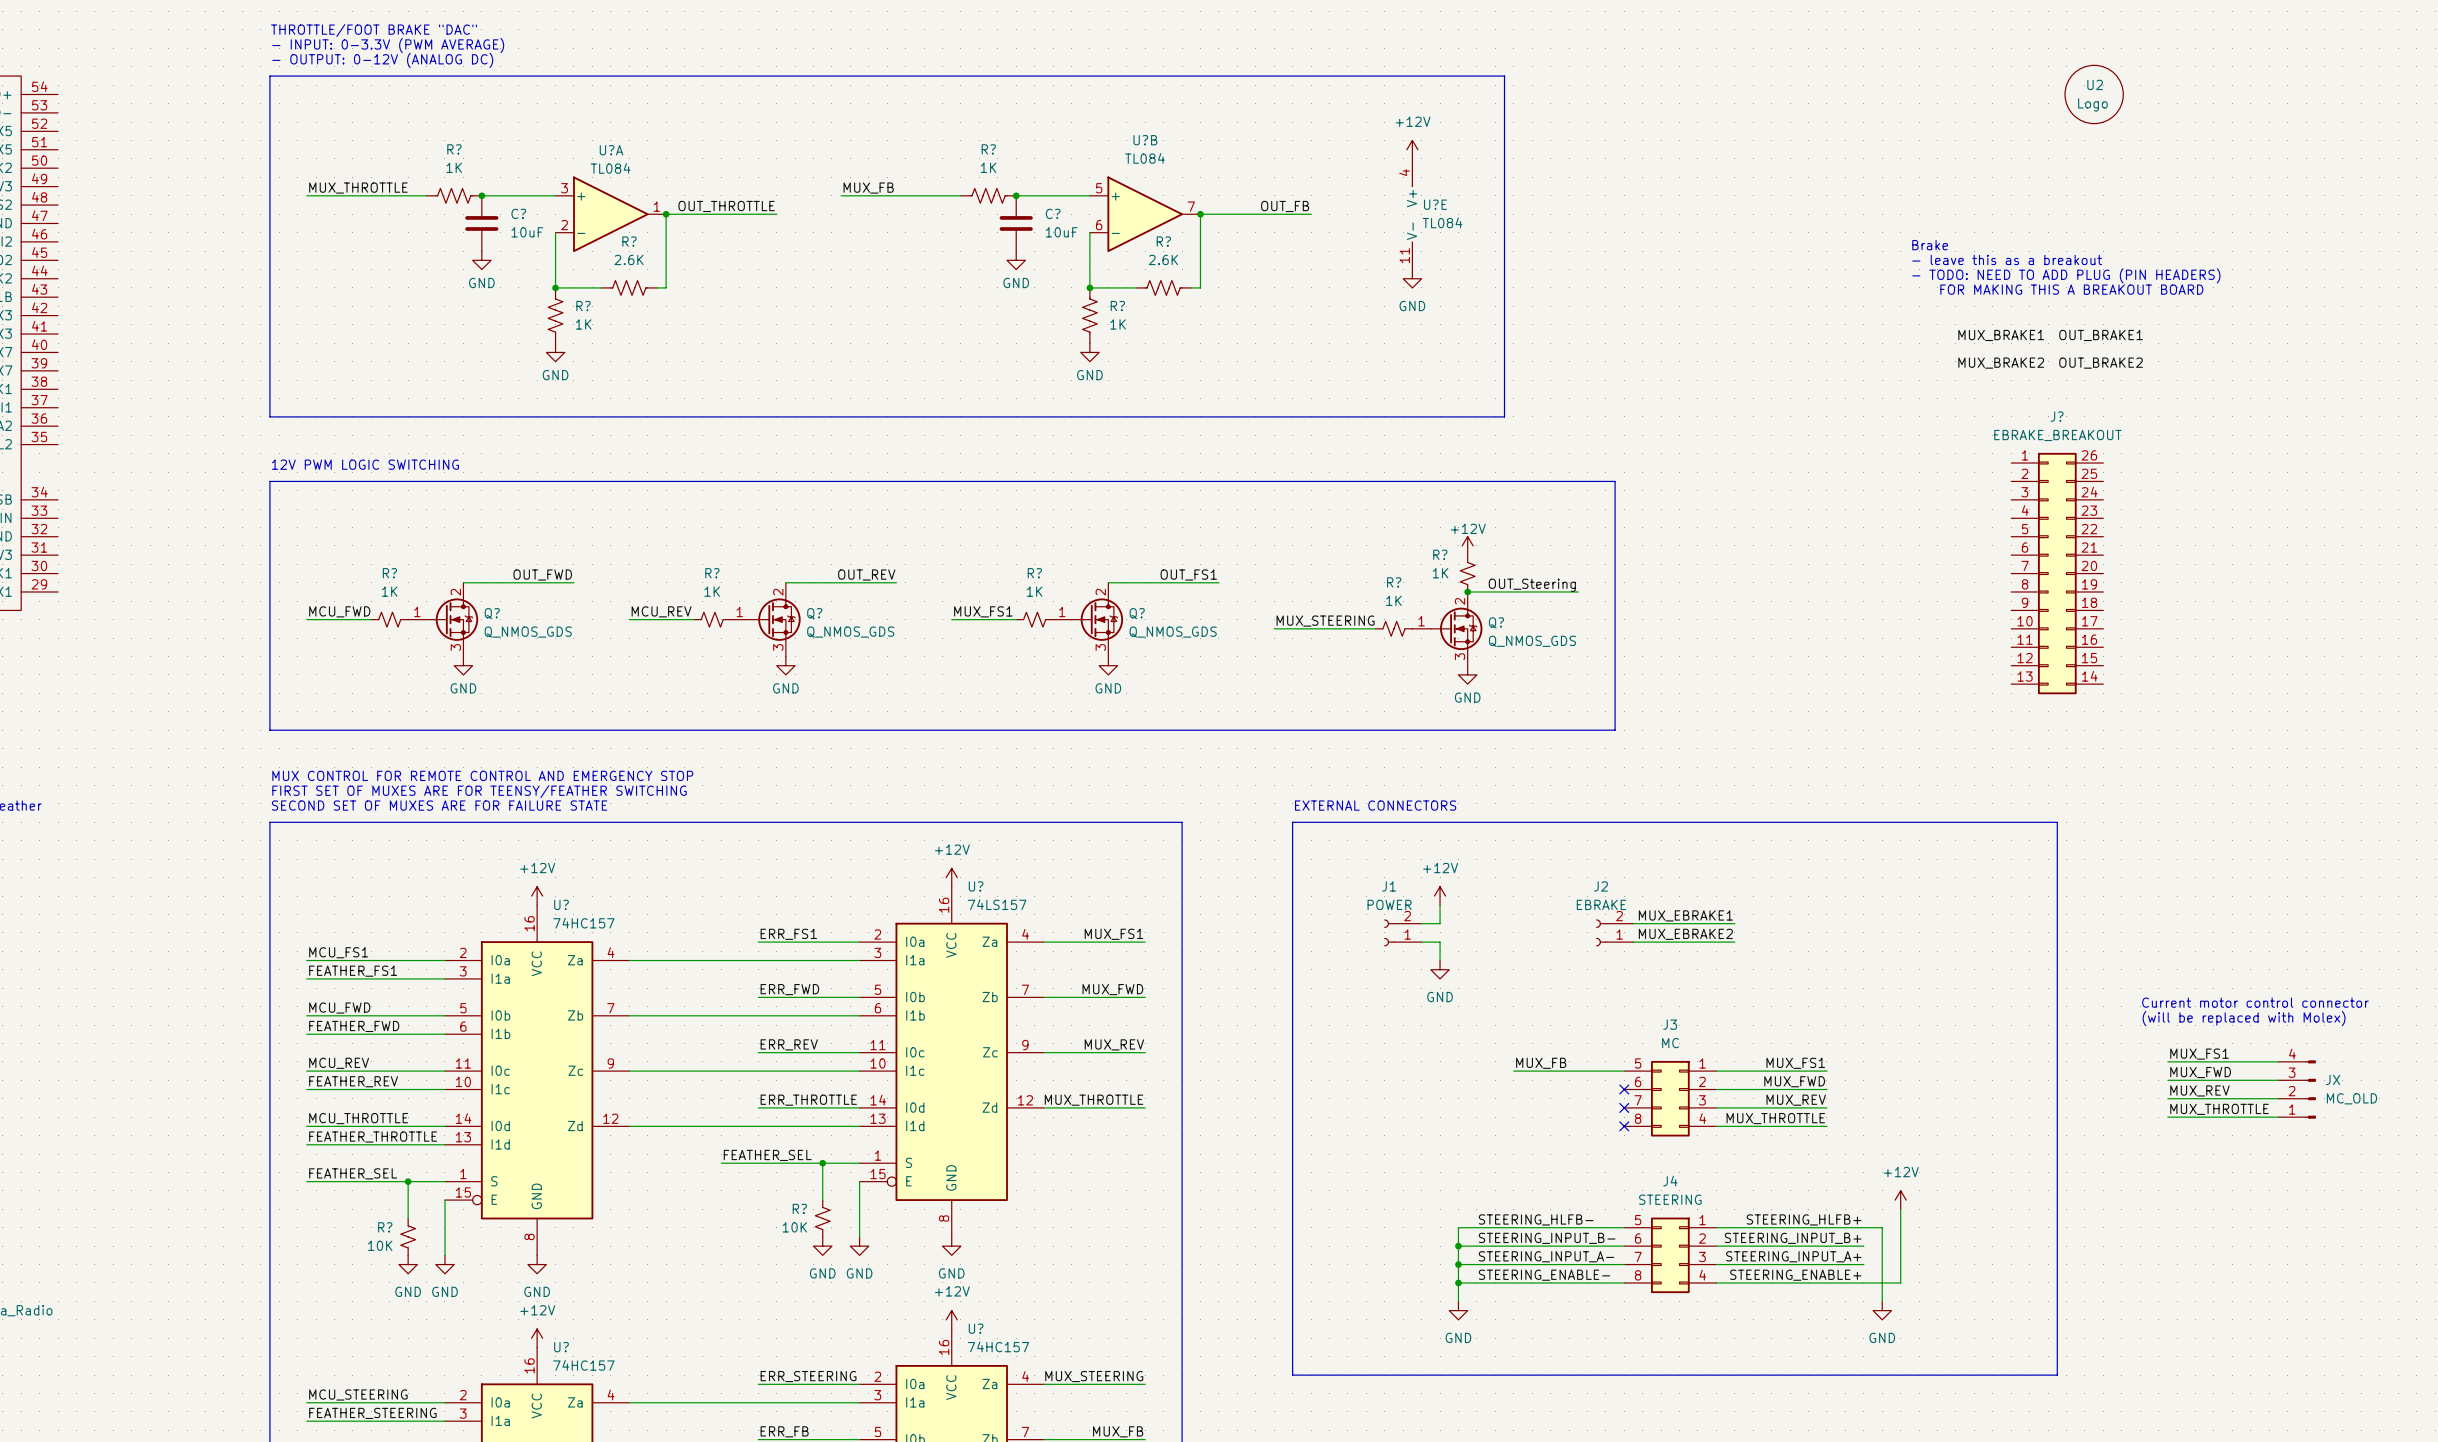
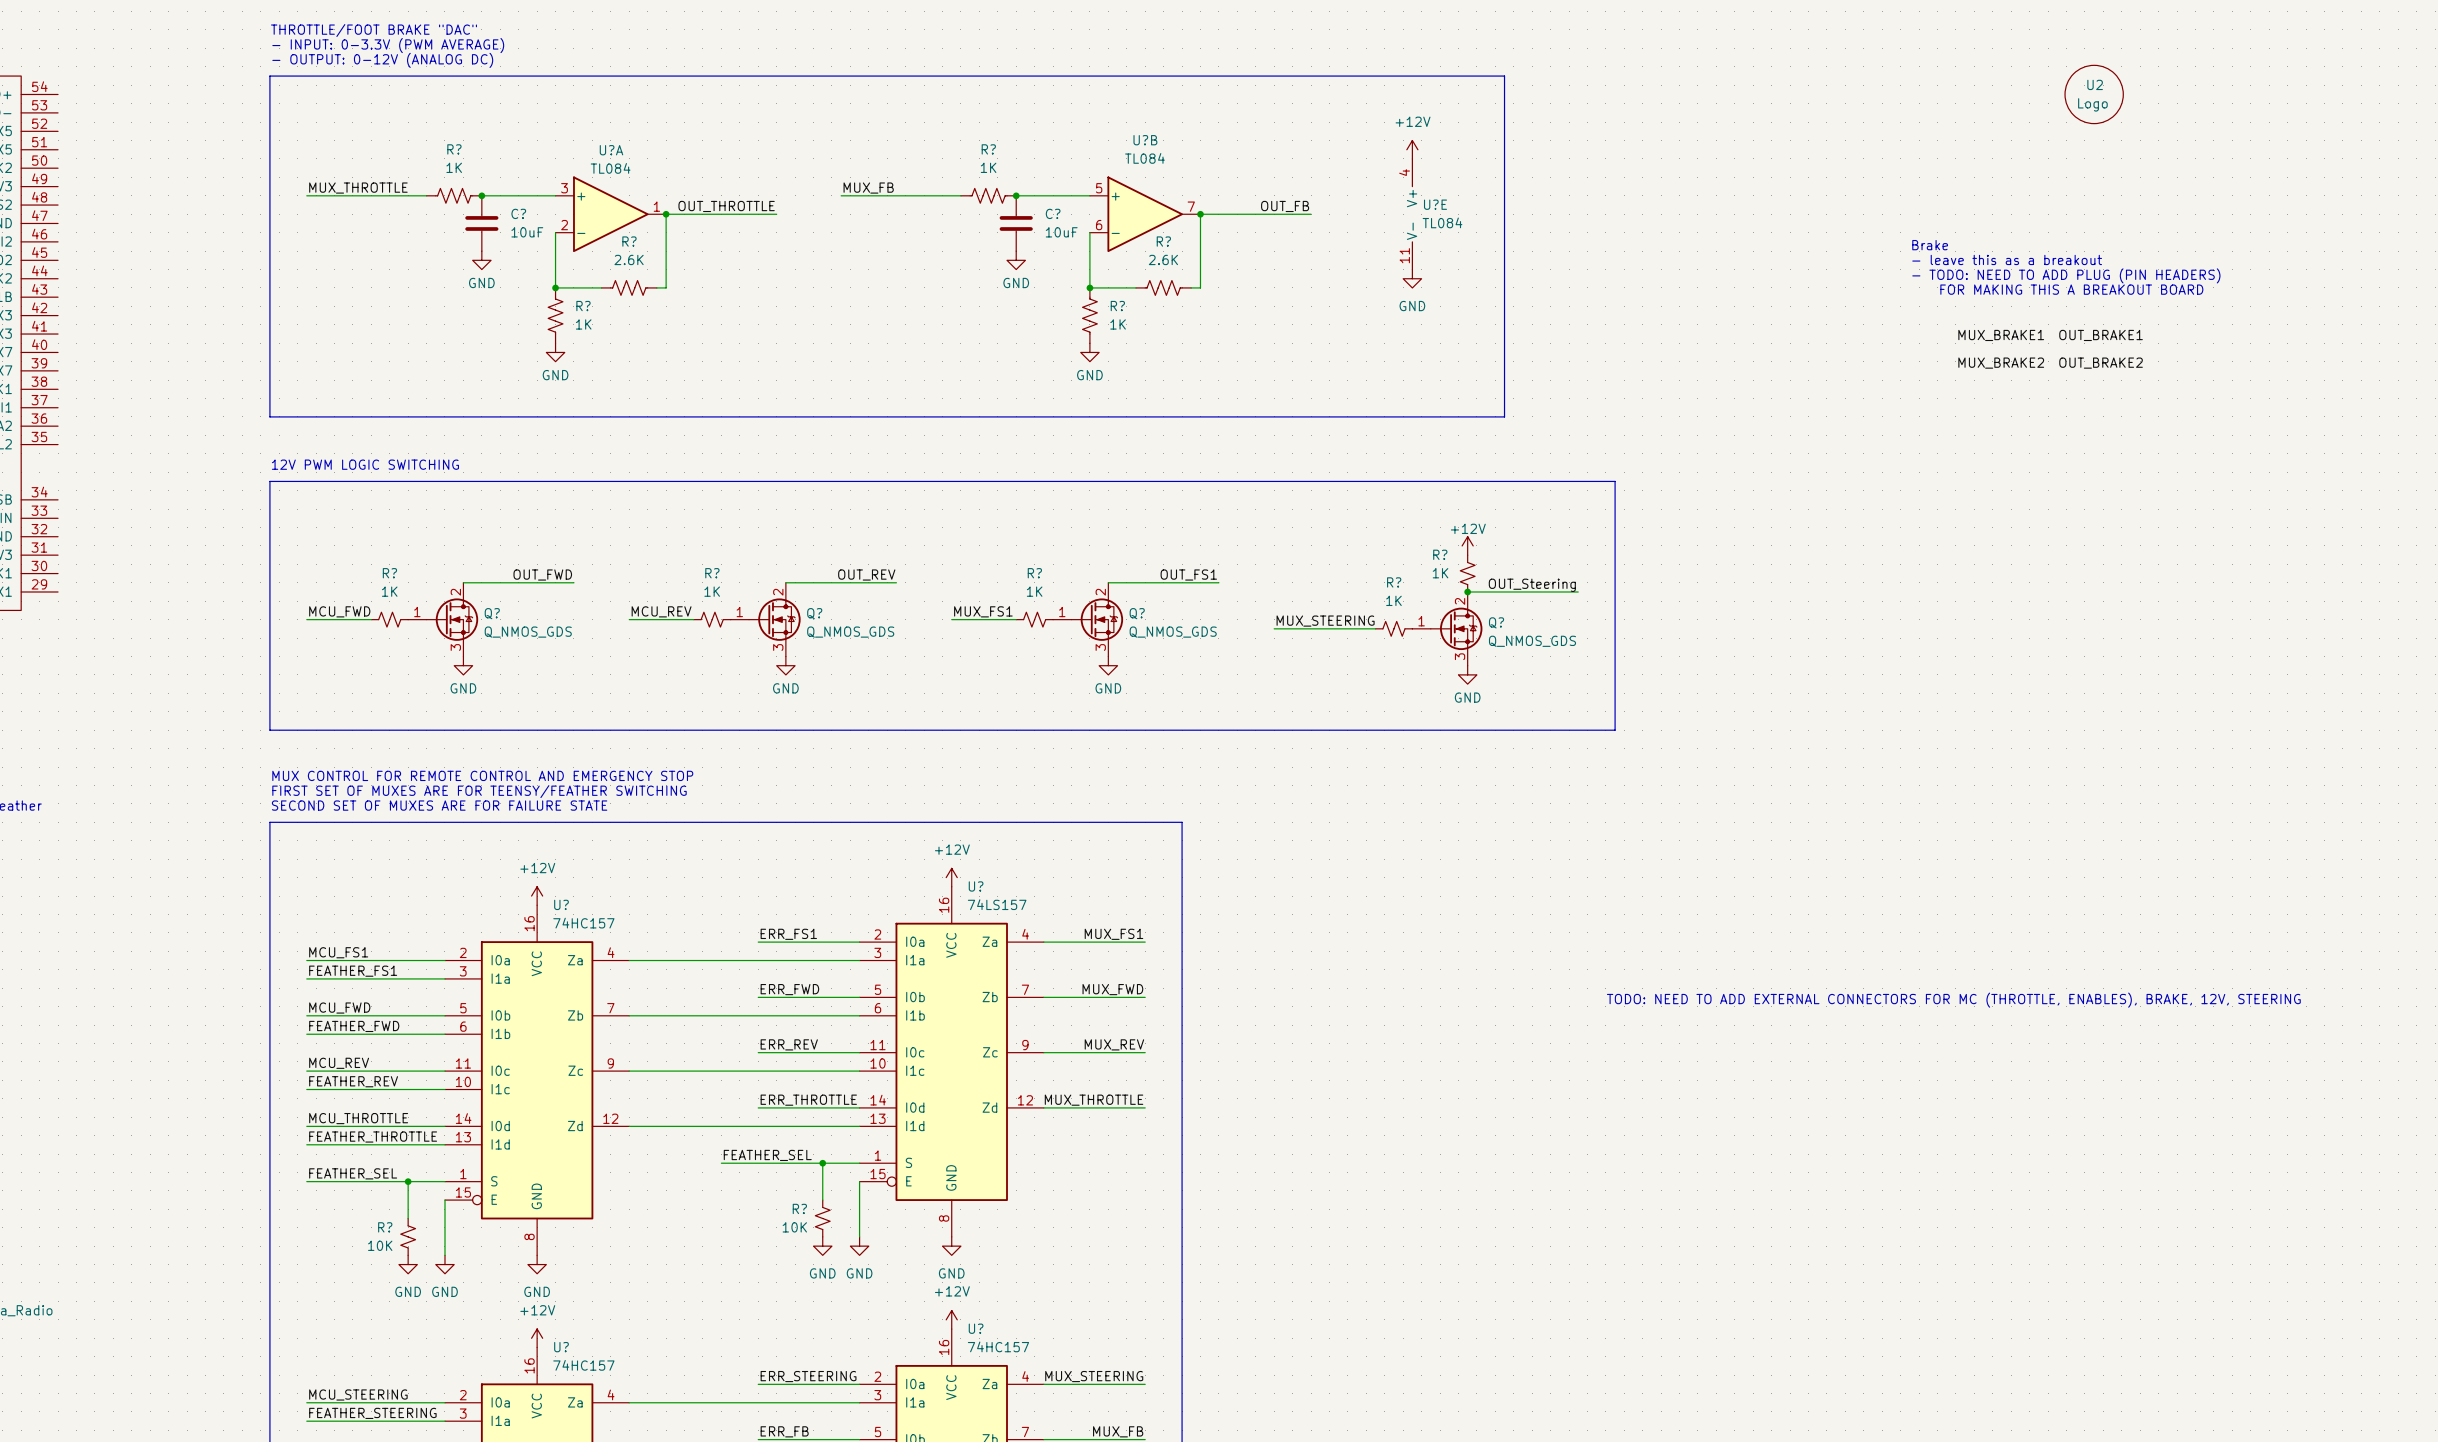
J?: EBRAKE_BREAKOUT (2057, 573) -> none
text: EXTERNAL CONNECTORS (1375, 805) -> none
line: (1292, 822) (1292, 1375) (2057, 1375) (2057, 822) (1292, 822) -> none
power symbol: +12V (1440, 896) -> none
wire: (1440, 905) (1440, 923) (1421, 923) -> none
label: MUX_EBRAKE1 (1685, 915) -> none
wire: (1633, 923) (1734, 923) -> none
J1: POWER (1402, 932) -> none
J2: EBRAKE (1614, 932) -> none
label: MUX_EBRAKE2 (1685, 934) -> none
wire: (1421, 942) (1440, 942) (1440, 960) -> none
wire: (1633, 942) (1734, 942) -> none
power symbol: GND (1440, 969) -> none
text: none -> TODO: NEED TO ADD EXTERNAL CONNECTORS FOR MC (THROTTLE, ENABLES), BRAKE, 12V, STEERING (1953, 1000)
text: Current motor control connector (2255, 1002) -> none
text: (will be replaced with Molex) (2244, 1018) -> none
label: MUX_FS1 (2199, 1054) -> none
wire: (2167, 1061) (2278, 1061) -> none
label: MUX_FB (1541, 1063) -> none
label: MUX_FS1 (1795, 1063) -> none
wire: (1513, 1071) (1624, 1071) -> none
wire: (1716, 1071) (1826, 1071) -> none
label: MUX_FWD (2200, 1072) -> none
wire: (2167, 1080) (2278, 1080) -> none
label: MUX_FWD (1794, 1081) -> none
no-connect mark: (1624, 1089) -> none
wire: (1716, 1089) (1826, 1089) -> none
JX: MC_OLD (2297, 1089) -> none
label: MUX_REV (2199, 1090) -> none
J3: MC (1670, 1098) -> none
wire: (2167, 1098) (2278, 1098) -> none
label: MUX_REV (1796, 1100) -> none
no-connect mark: (1624, 1107) -> none
wire: (1716, 1107) (1826, 1107) -> none
label: MUX_THROTTLE (2219, 1109) -> none
wire: (2167, 1117) (2278, 1117) -> none
label: MUX_THROTTLE (1775, 1118) -> none
no-connect mark: (1624, 1126) -> none
wire: (1716, 1126) (1826, 1126) -> none
power symbol: +12V (1900, 1200) -> none
wire: (1900, 1209) (1900, 1282) (1716, 1282) -> none
label: STEERING_HLFB- (1536, 1219) -> none
label: STEERING_HLFB+ (1804, 1219) -> none
wire: (1624, 1227) (1458, 1227) (1458, 1301) -> none
wire: (1716, 1227) (1882, 1227) (1882, 1301) -> none
label: STEERING_INPUT_B- (1547, 1238) -> none
label: STEERING_INPUT_B+ (1793, 1238) -> none
wire: (1458, 1246) (1624, 1246) -> none
junction: (1458, 1246) -> none
wire: (1716, 1246) (1863, 1246) -> none
J4: STEERING (1670, 1255) -> none
label: STEERING_INPUT_A- (1546, 1256) -> none
label: STEERING_INPUT_A+ (1793, 1256) -> none
wire: (1458, 1264) (1624, 1264) -> none
junction: (1458, 1264) -> none
wire: (1716, 1264) (1863, 1264) -> none
label: STEERING_ENABLE- (1544, 1275) -> none
label: STEERING_ENABLE+ (1795, 1275) -> none
wire: (1458, 1282) (1624, 1282) -> none
junction: (1458, 1282) -> none
power symbol: GND (1458, 1310) -> none
power symbol: GND (1882, 1310) -> none

